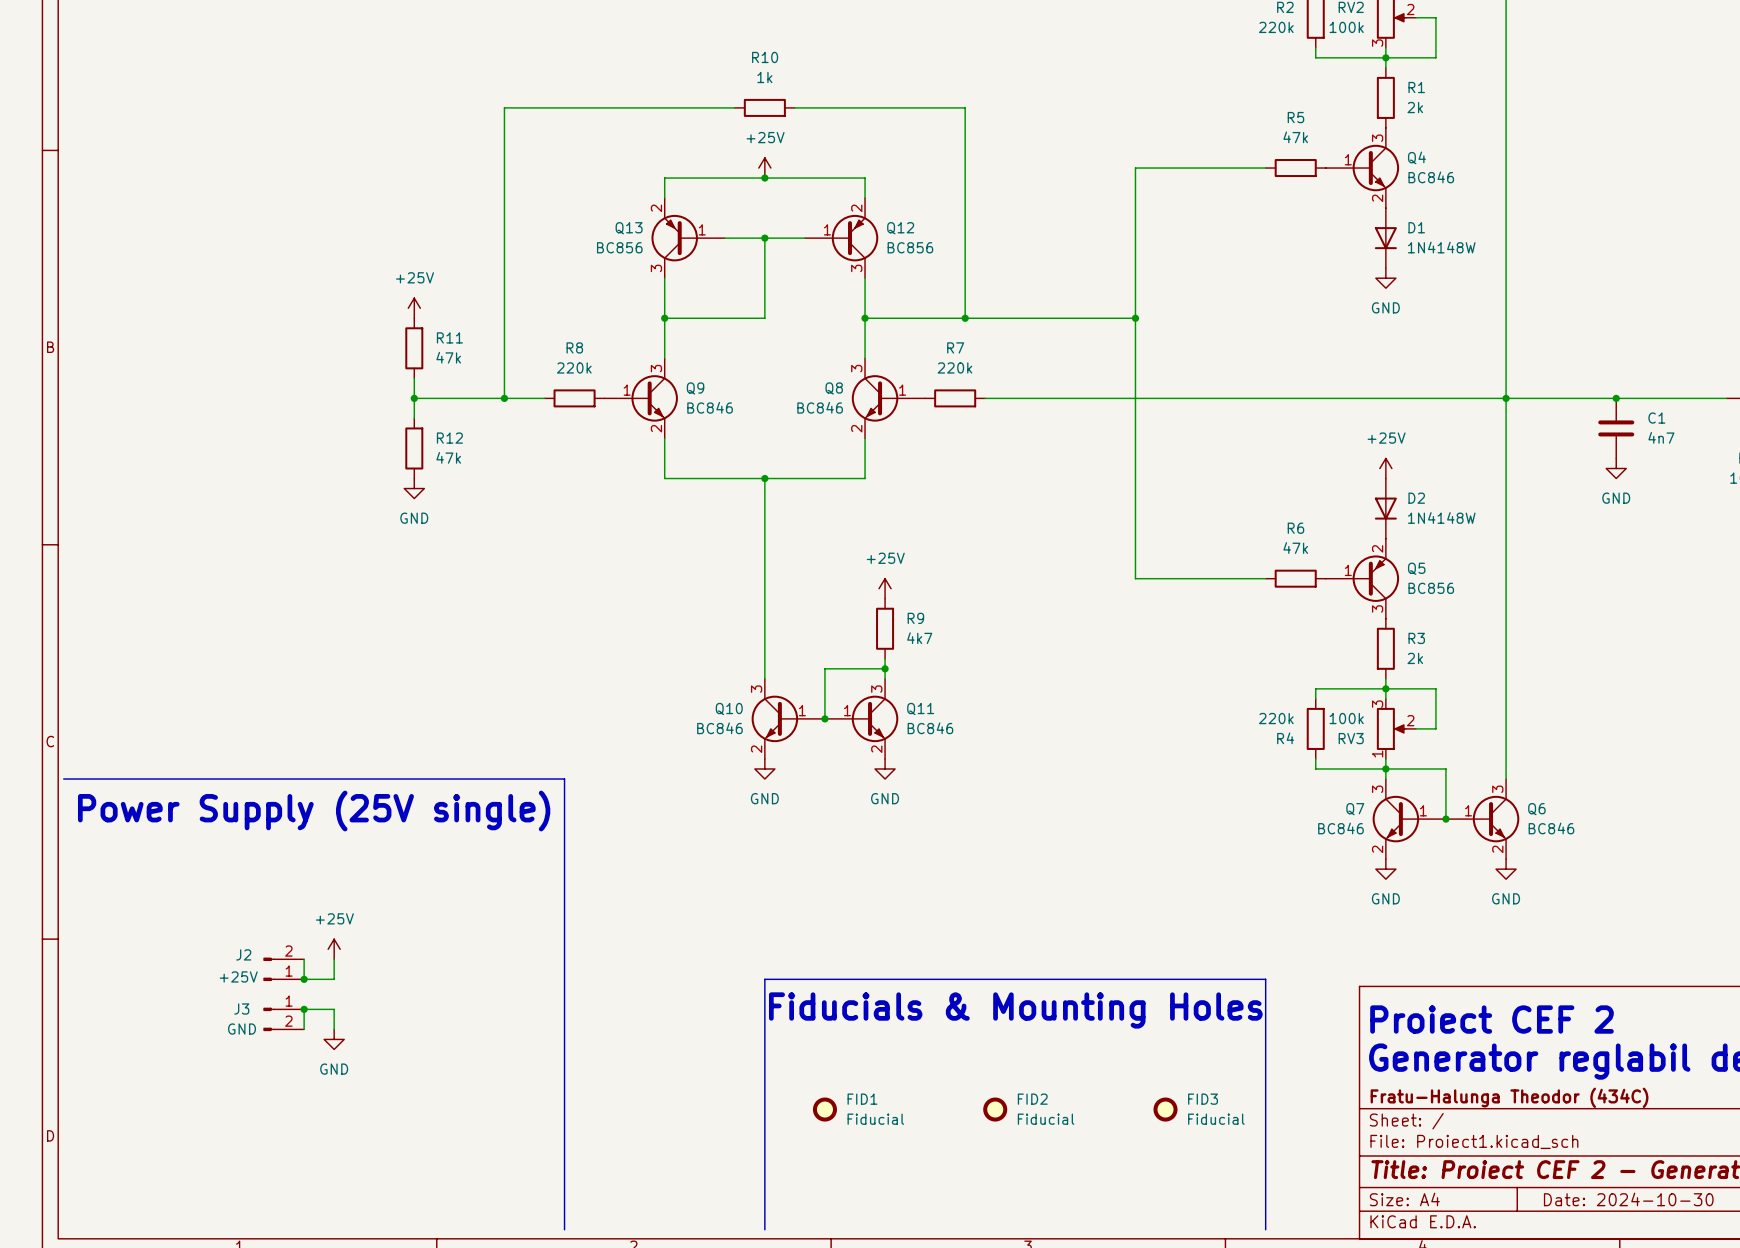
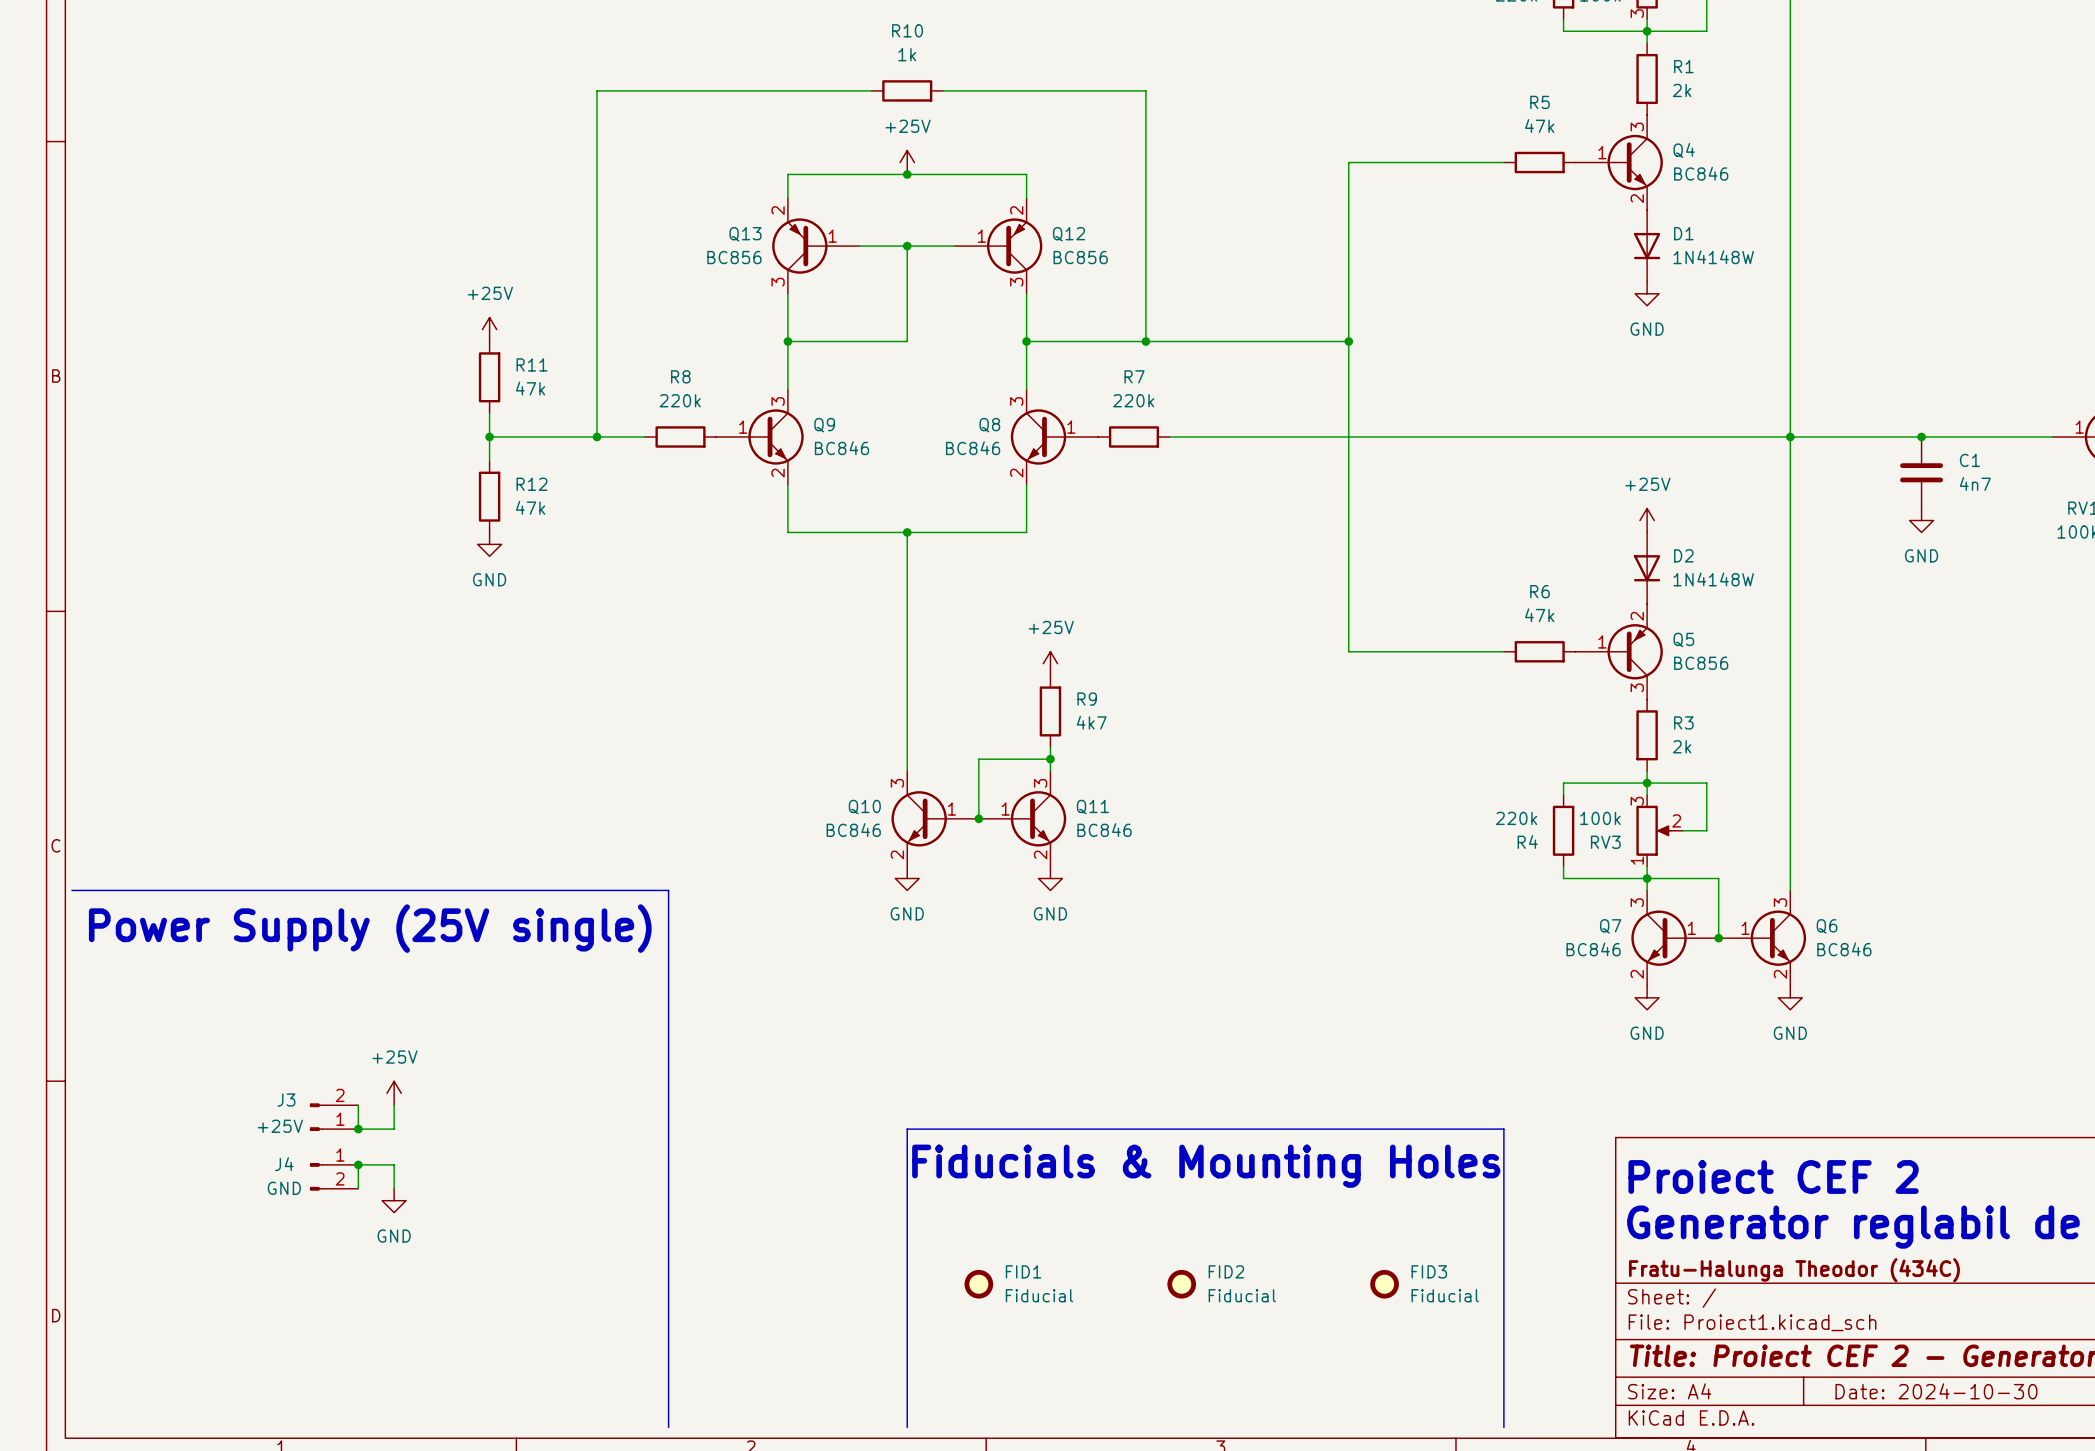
J2 name: J2 (243, 954) -> J3 (286, 1100)
J3 name: J3 (241, 1009) -> J4 (284, 1164)

